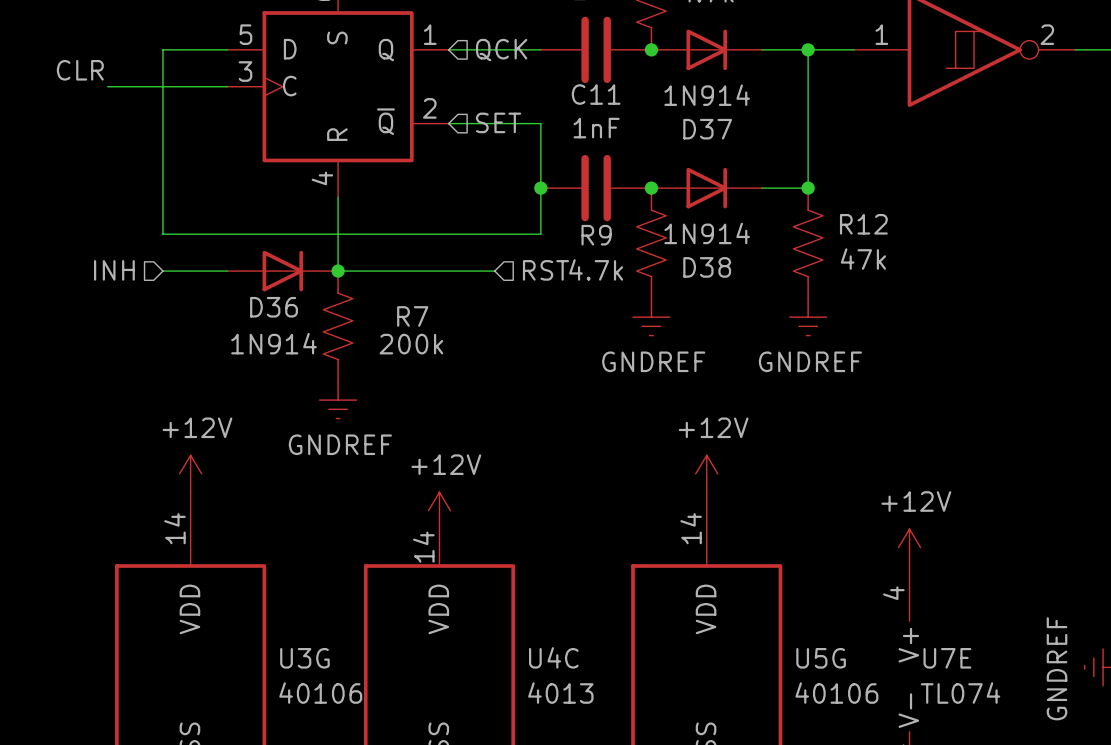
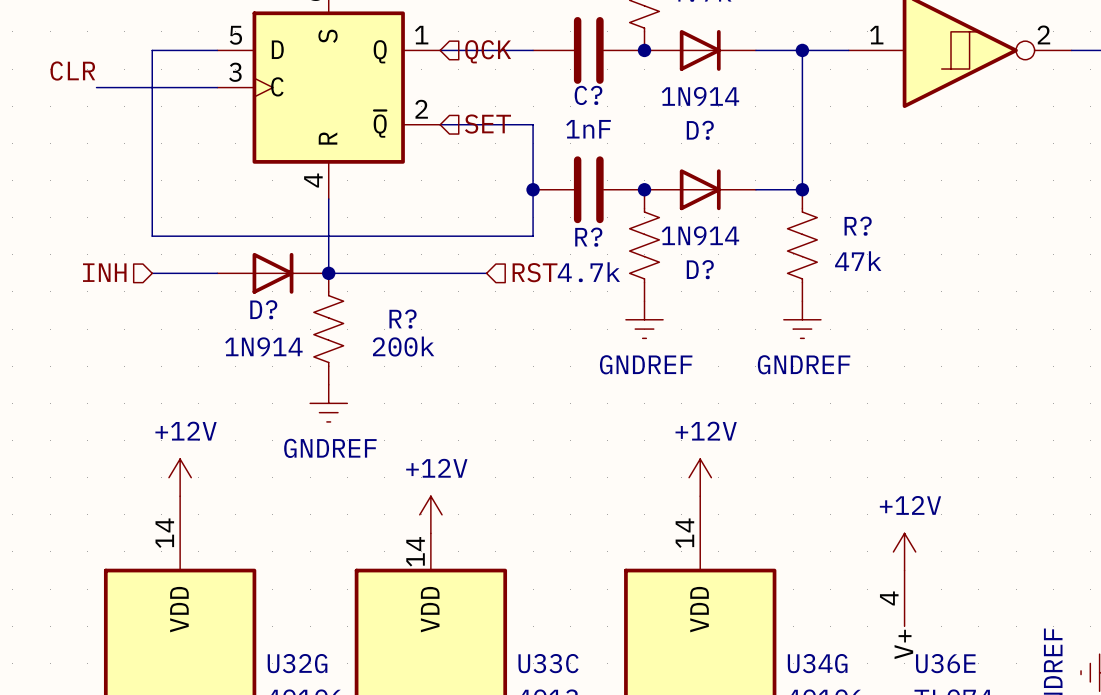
C11 name: C11 (596, 94) -> C? (588, 95)
D37 name: D37 (707, 129) -> D? (700, 130)
R12 name: R12 (863, 224) -> R? (858, 226)
R9 name: R9 (596, 235) -> R? (588, 237)
D38 name: D38 (707, 267) -> D? (700, 269)
D36 name: D36 (274, 307) -> D? (263, 309)
R7 name: R7 (412, 316) -> R? (403, 319)
U4C name: U4C (553, 657) -> U33C (548, 663)
U3G name: U3G (304, 658) -> U32G (297, 663)
U5G name: U5G (821, 658) -> U34G (817, 663)
U7E name: U7E (947, 658) -> U36E (945, 663)

